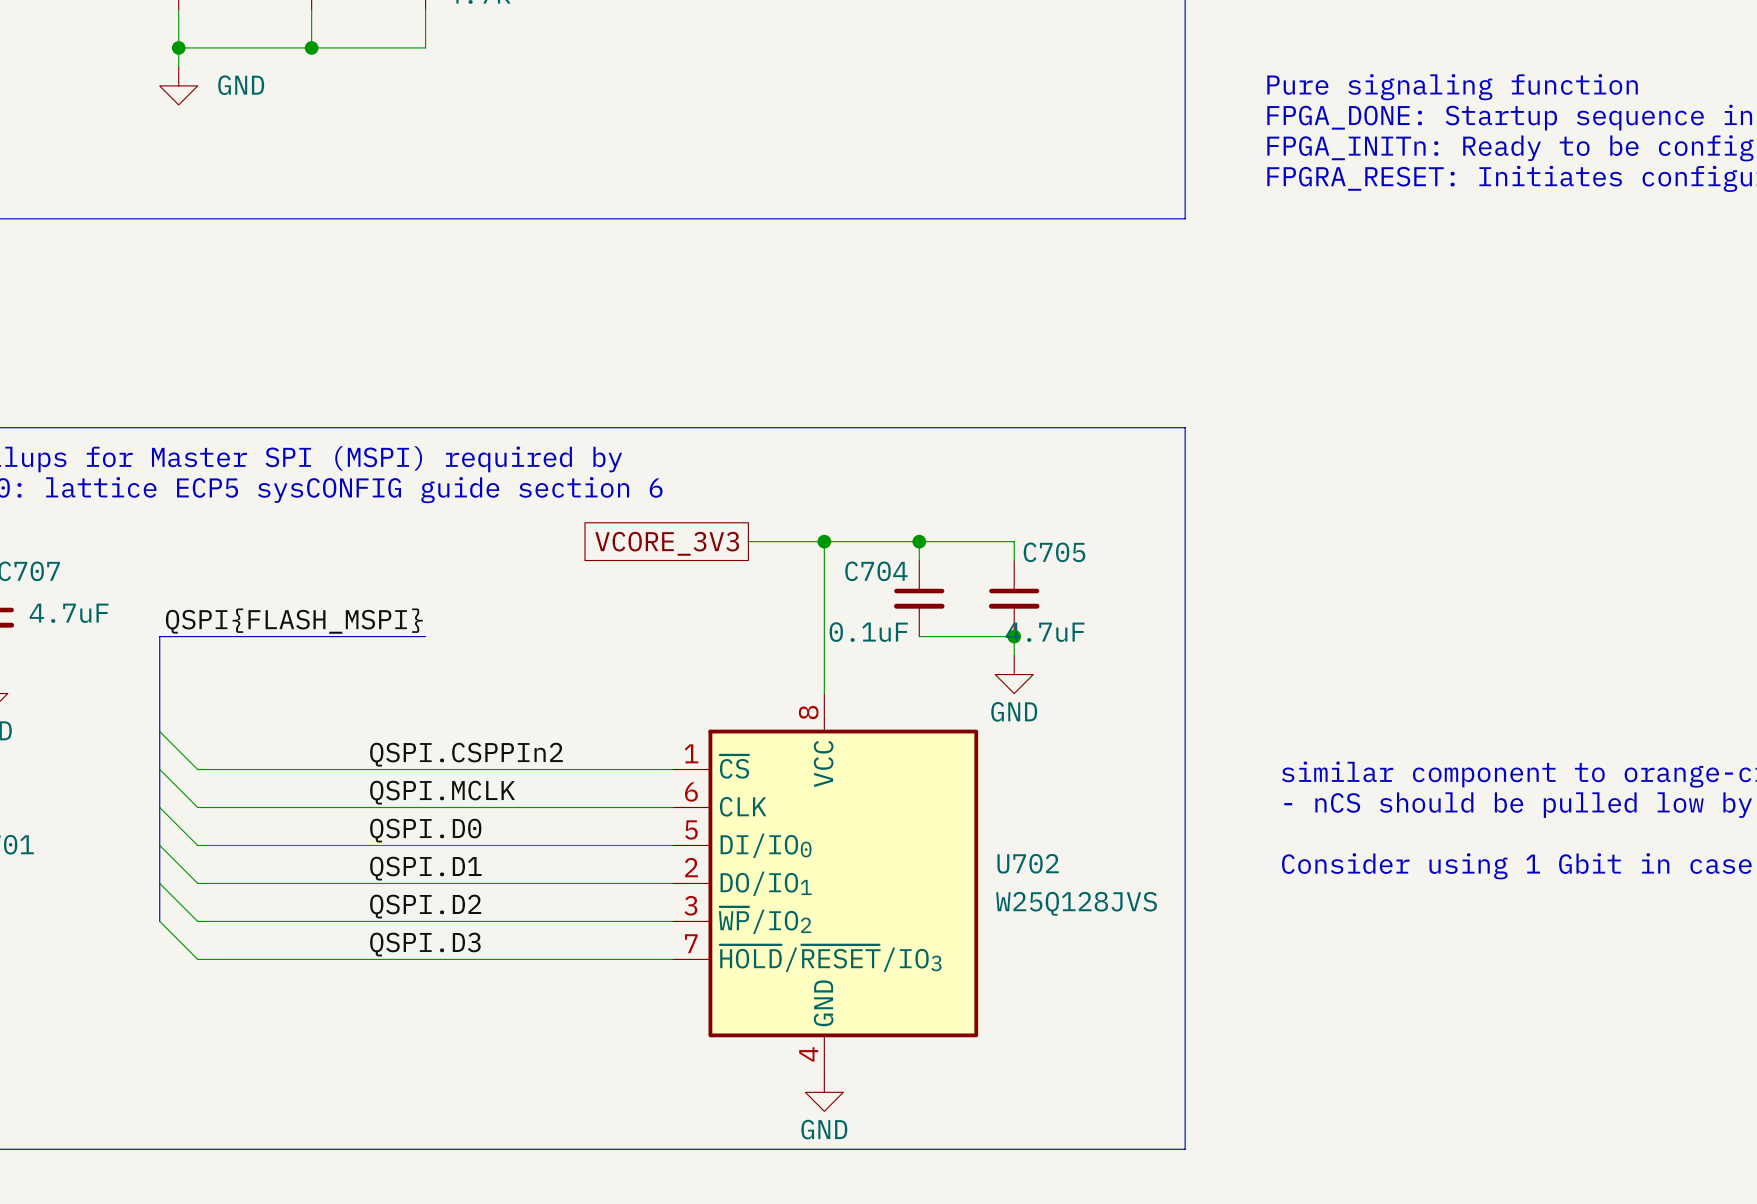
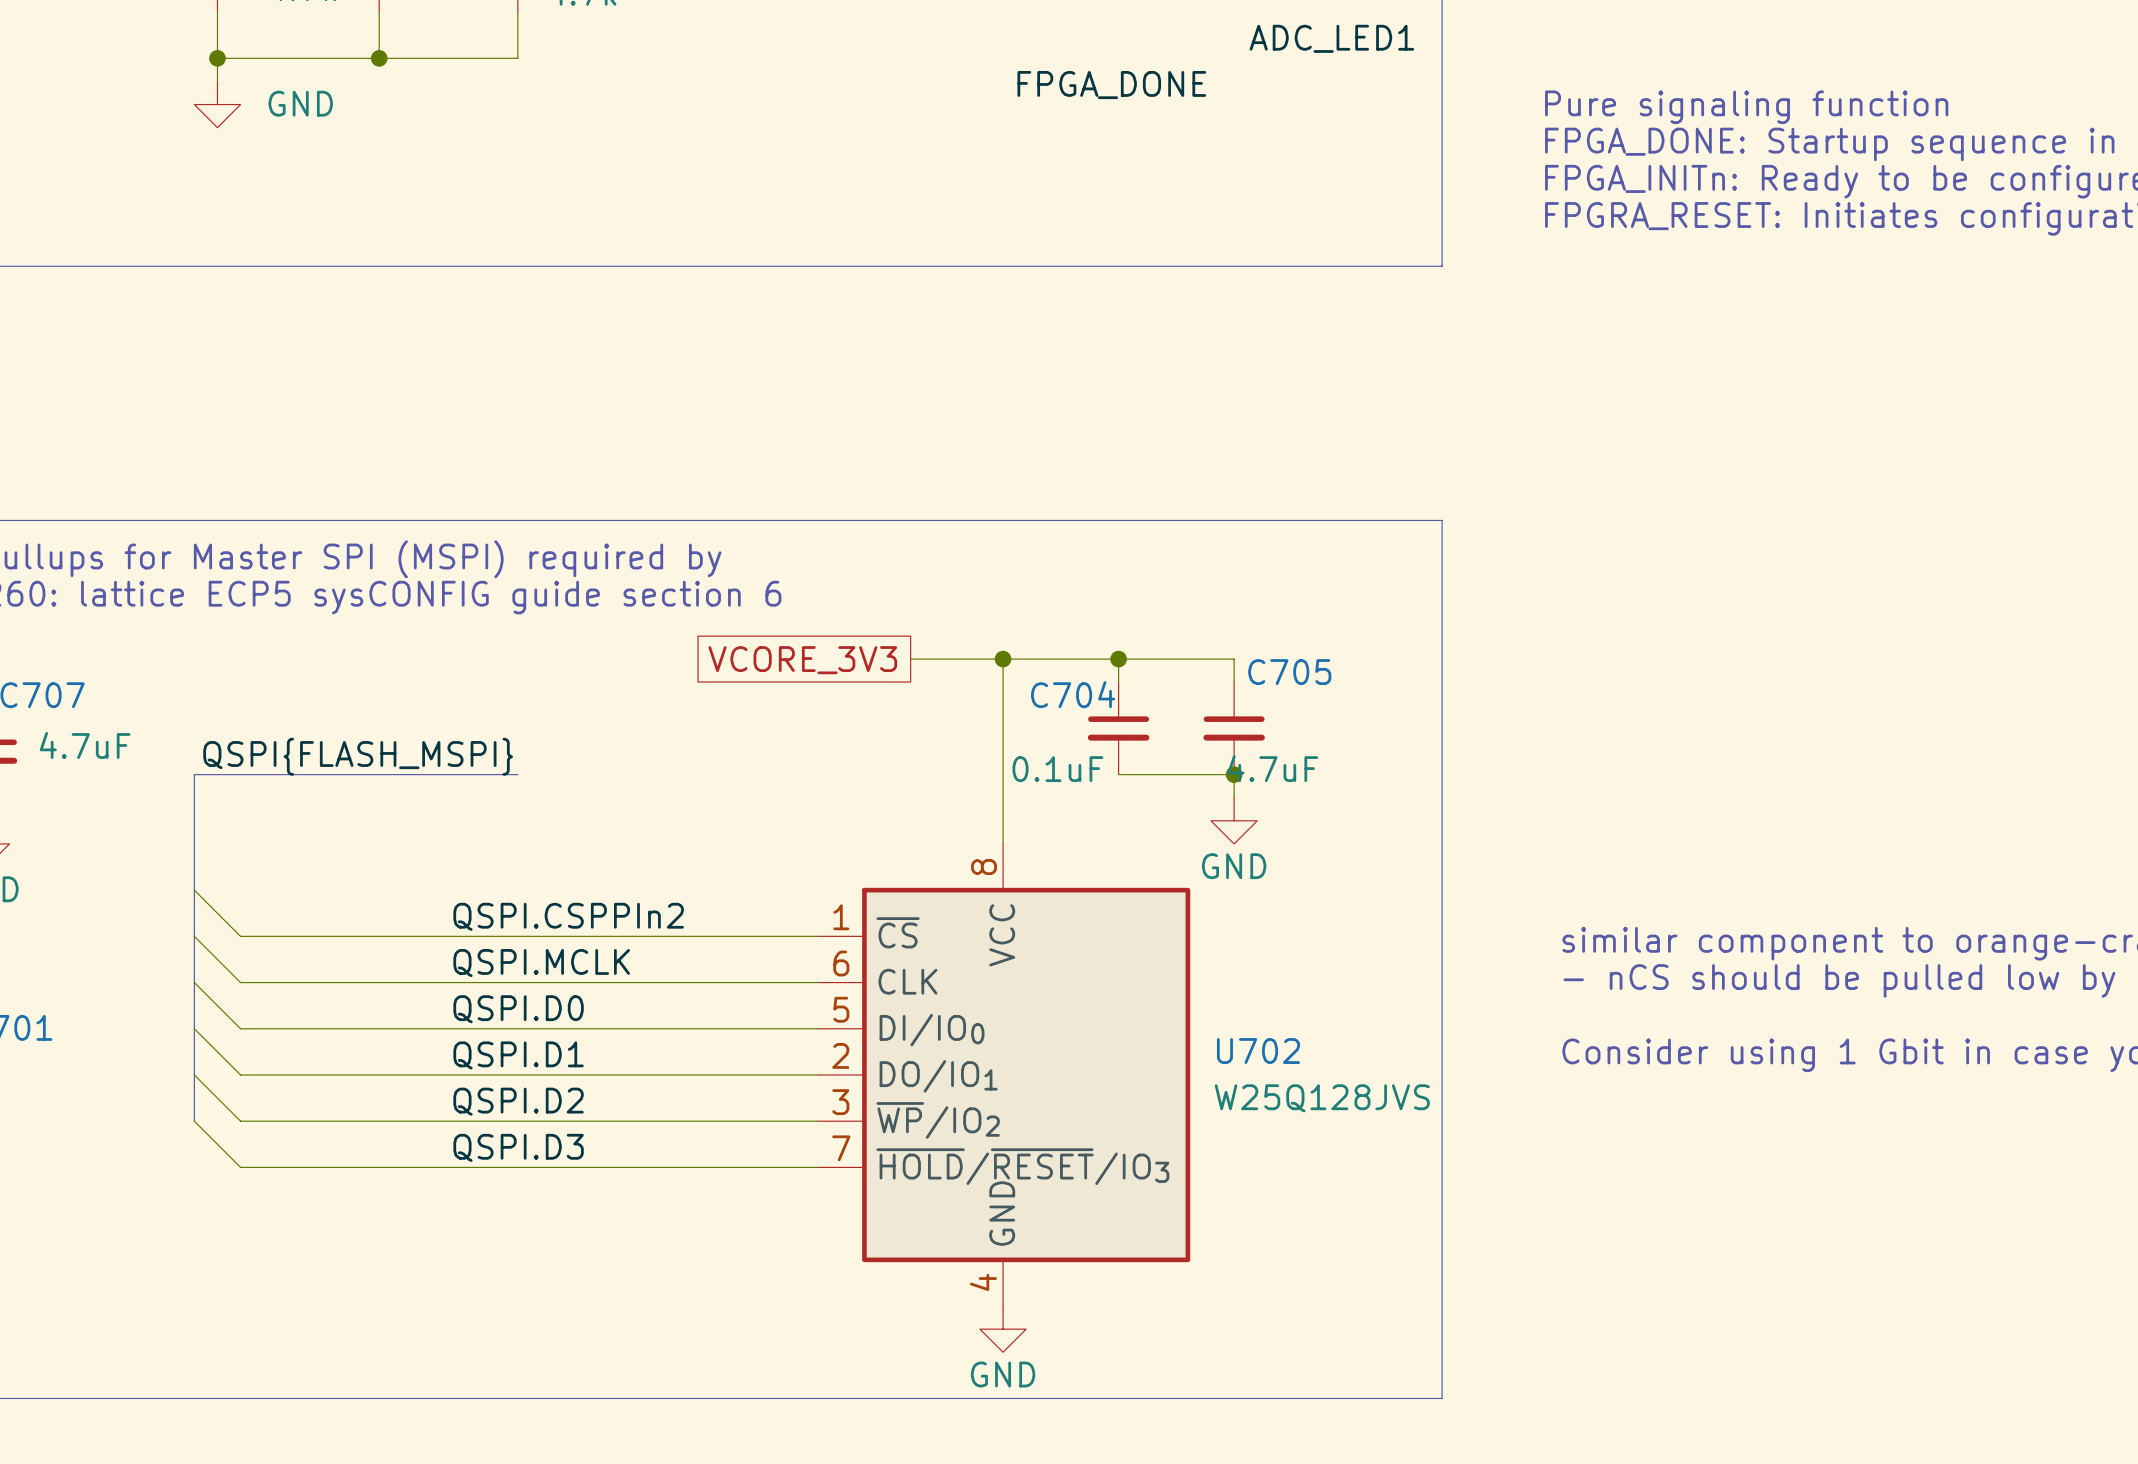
label: none -> ADC_LED1 (1331, 38)
label: none -> FPGA_DONE (1111, 85)

